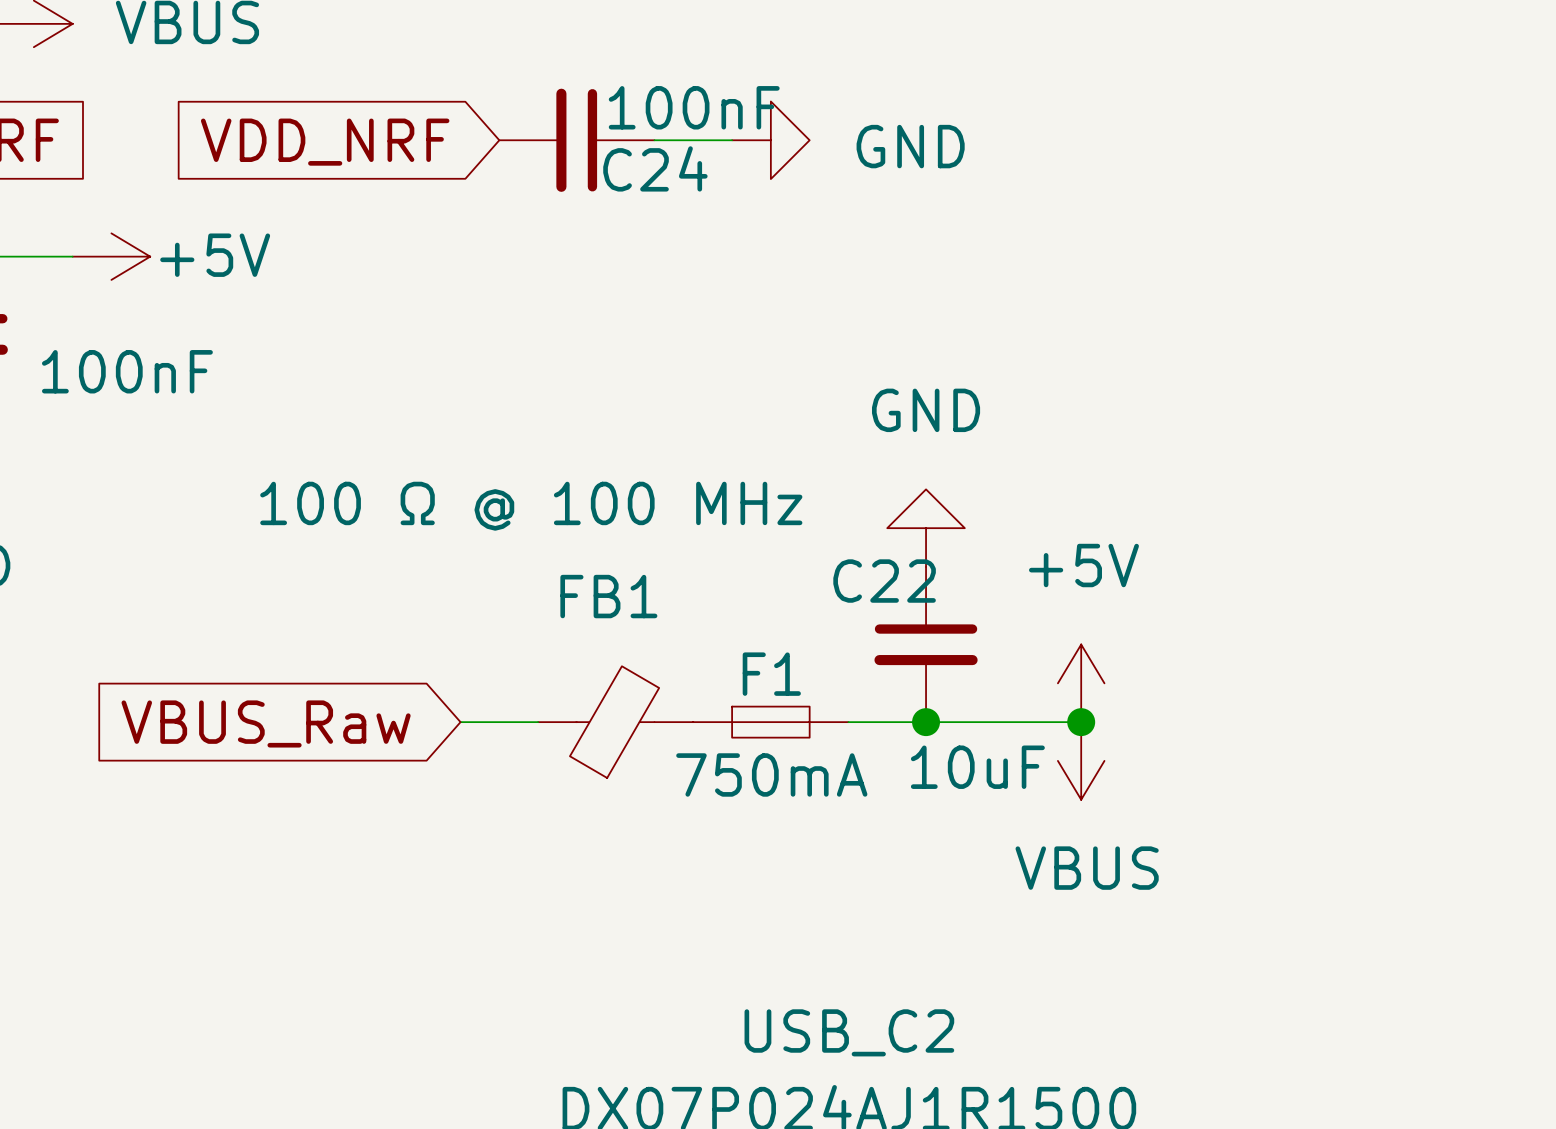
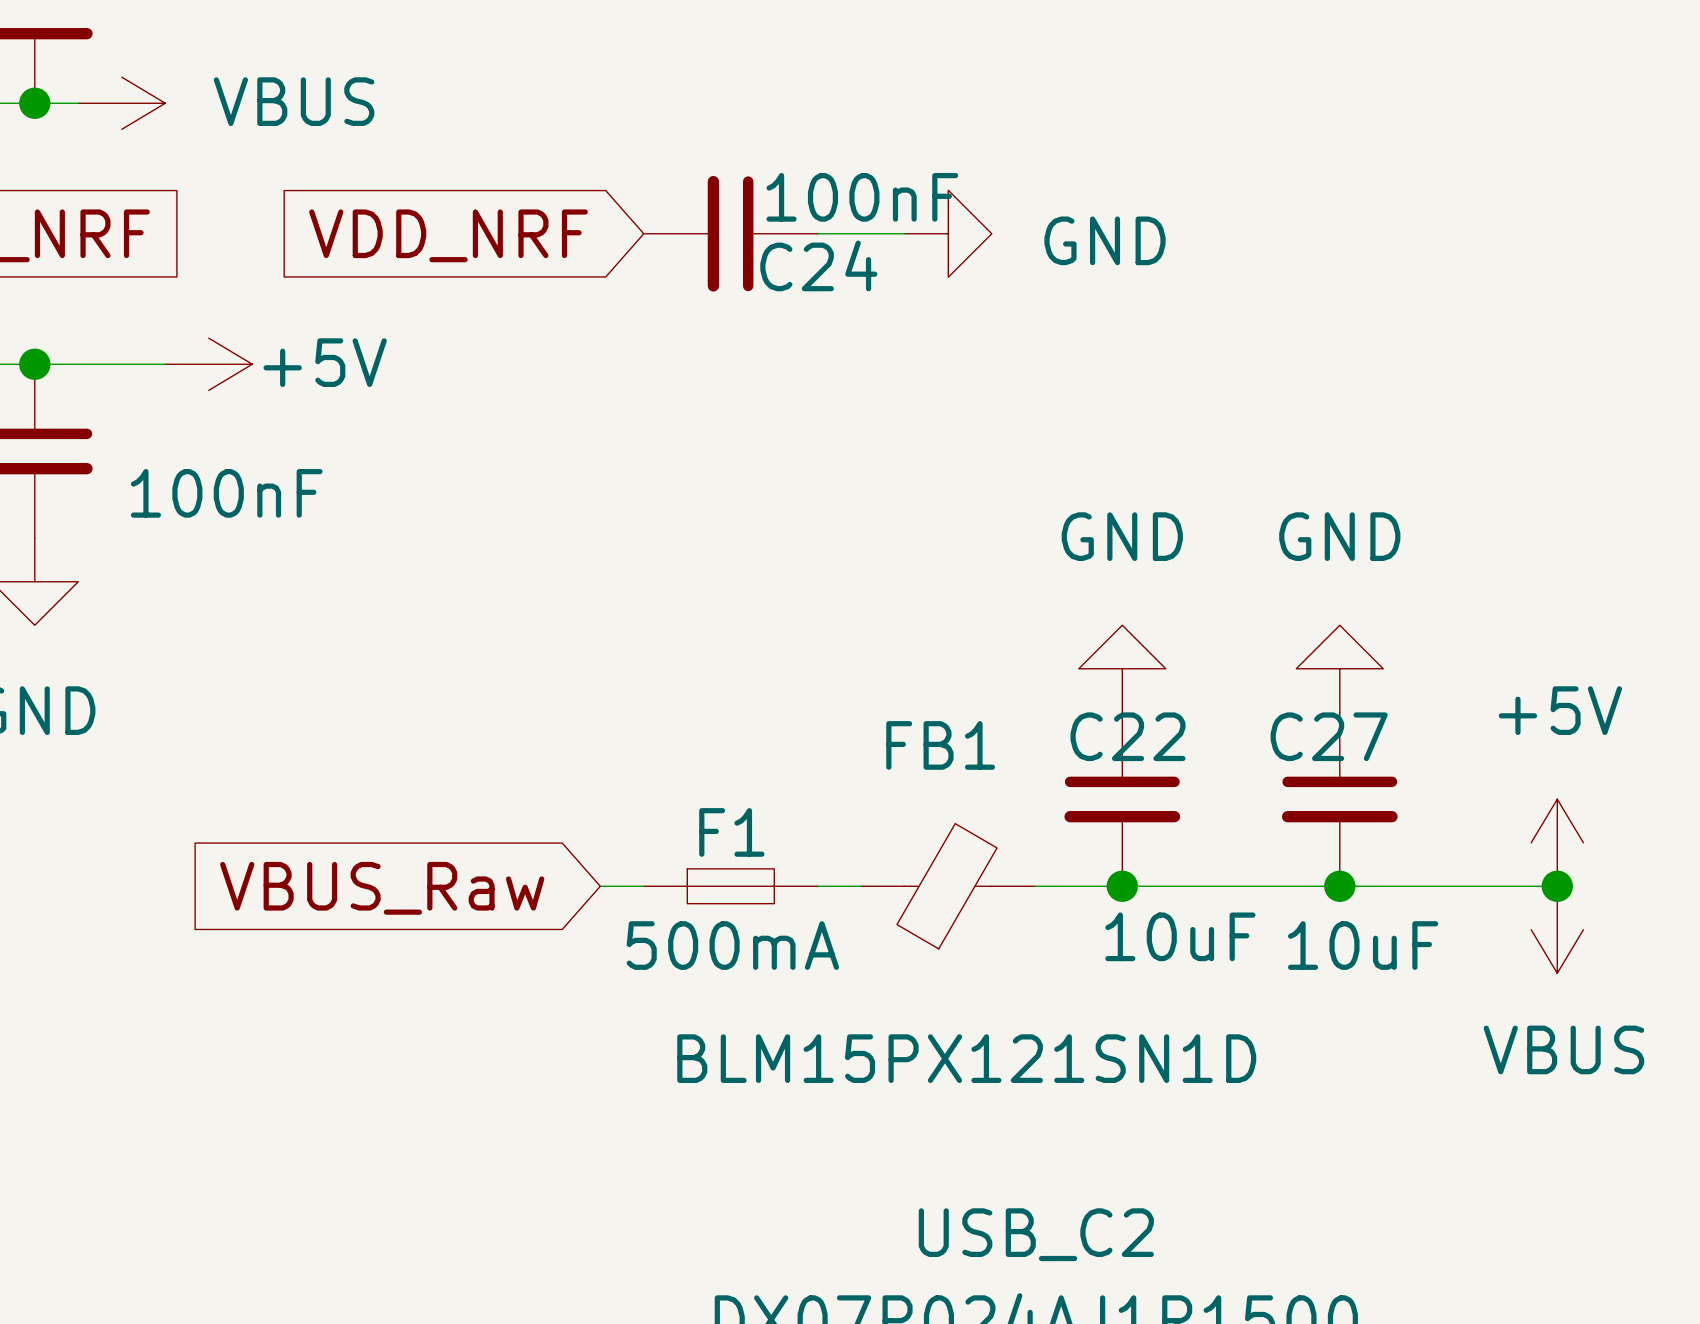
FB1 value: 100 Ω @ 100 MHz (531, 506) -> BLM15PX121SN1D (966, 1058)
power symbol: none -> GND (1339, 668)
C22 name position: C22 (884, 581) -> C22 (1128, 736)
C27: none -> 10uF (1339, 799)
power symbol position: +5V (1081, 683) -> +5V (1557, 842)
FB1 position: (615, 722) -> (948, 886)
F1 position: (770, 722) -> (730, 886)
wire: none -> (1296, 886) (1557, 886)
junction position: (1081, 722) -> (1339, 886)
junction: none -> (1557, 886)
power symbol position: VBUS (1081, 760) -> VBUS (1557, 929)
F1 value: 750mA (771, 774) -> 500mA (732, 945)

